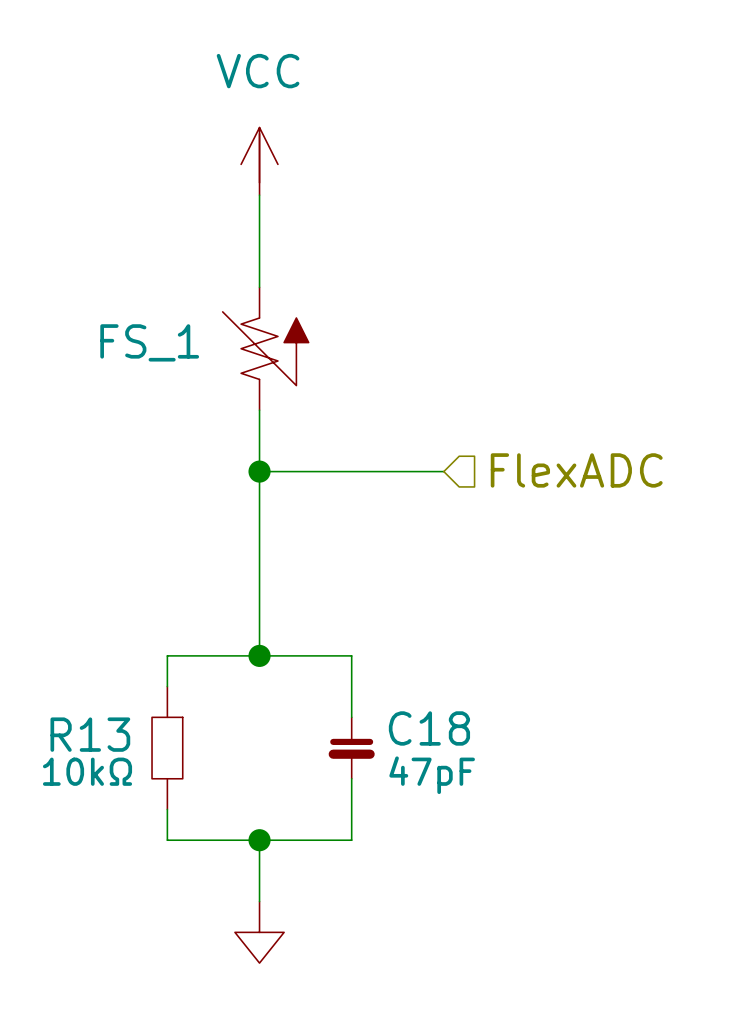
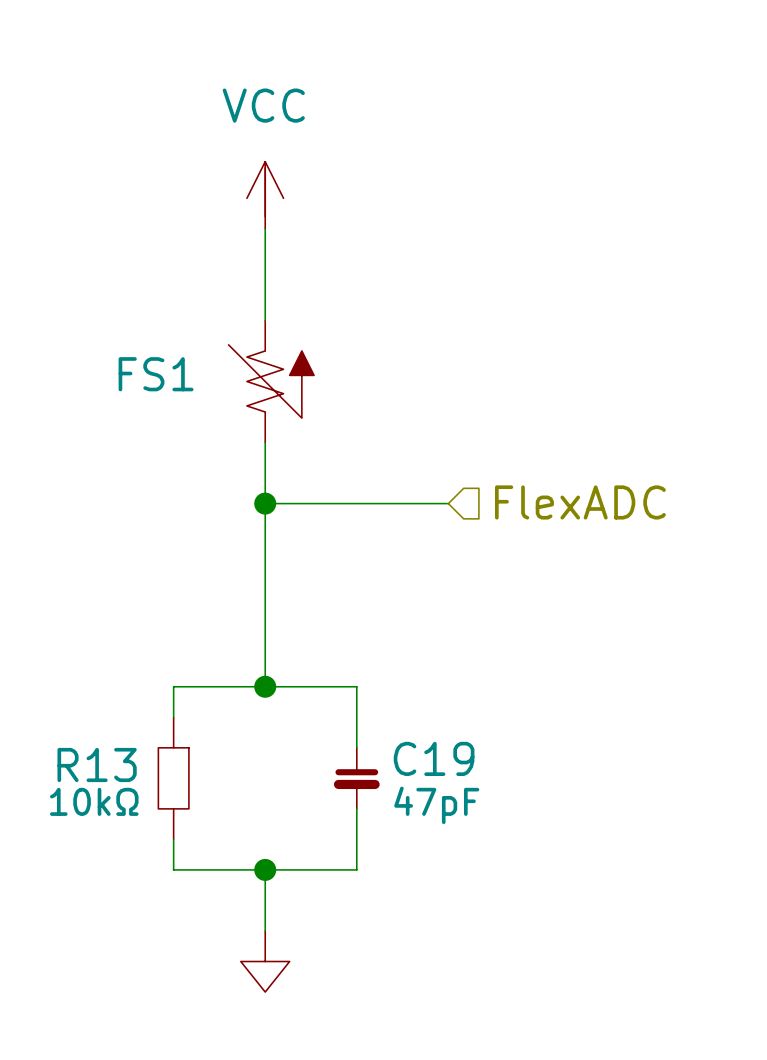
FS_1 name: FS_1 (149, 342) -> FS1 (156, 374)
C18 name: C18 (429, 728) -> C19 (434, 758)

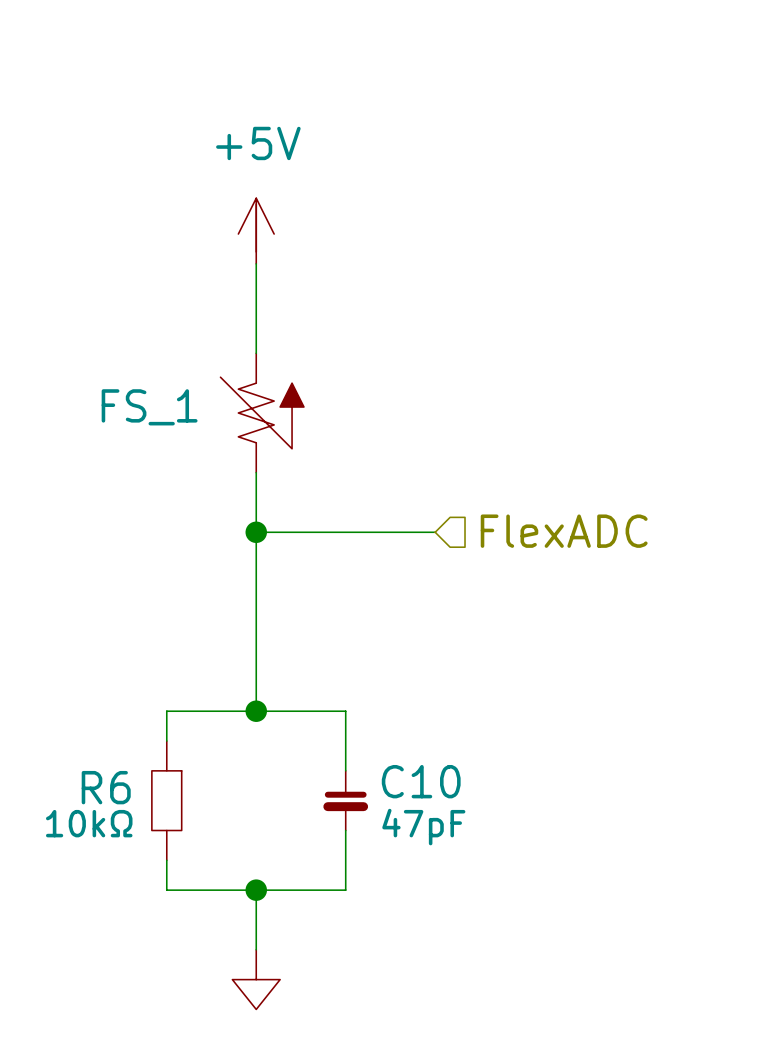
power symbol: VCC (265, 195) -> +5V (256, 231)
FS1 name: FS1 (156, 374) -> FS_1 (149, 407)
C19 name: C19 (434, 758) -> C10 (421, 781)
R13 name: R13 (97, 765) -> R6 (106, 787)

